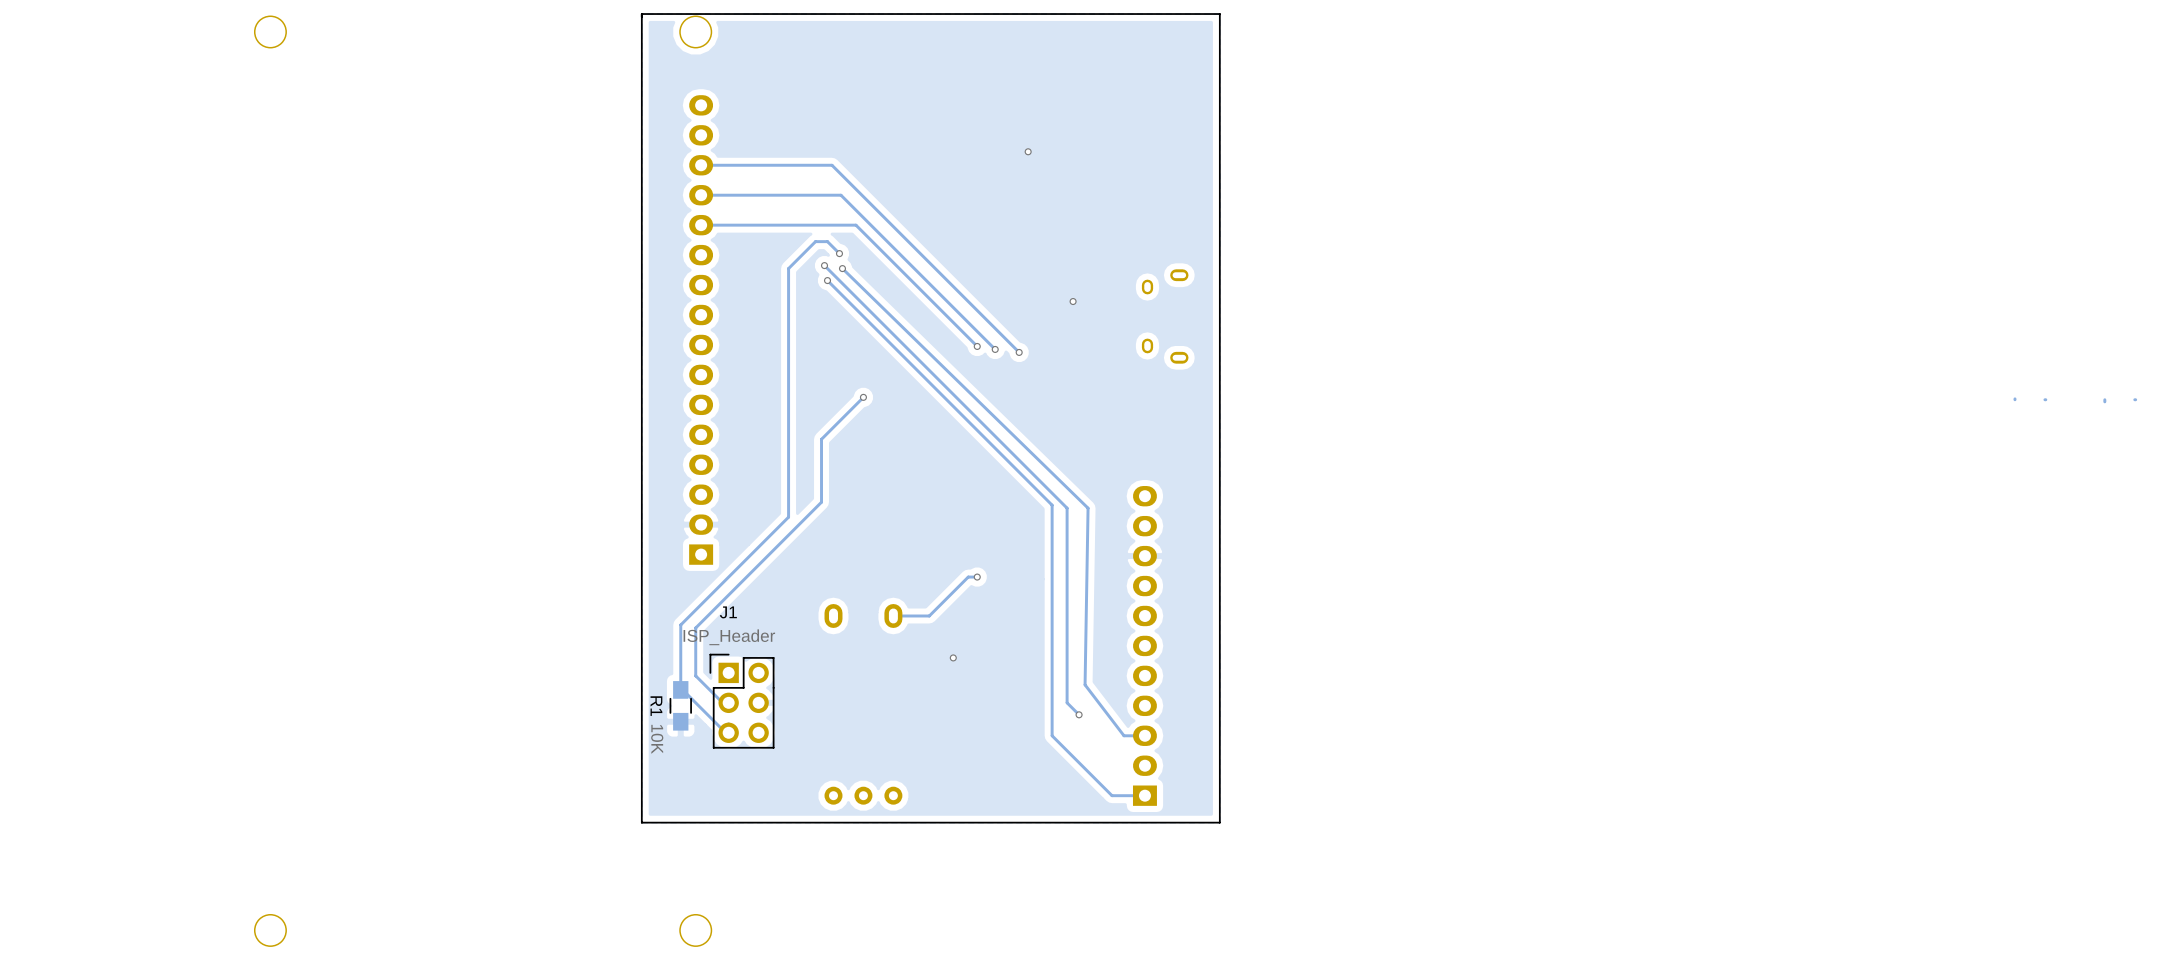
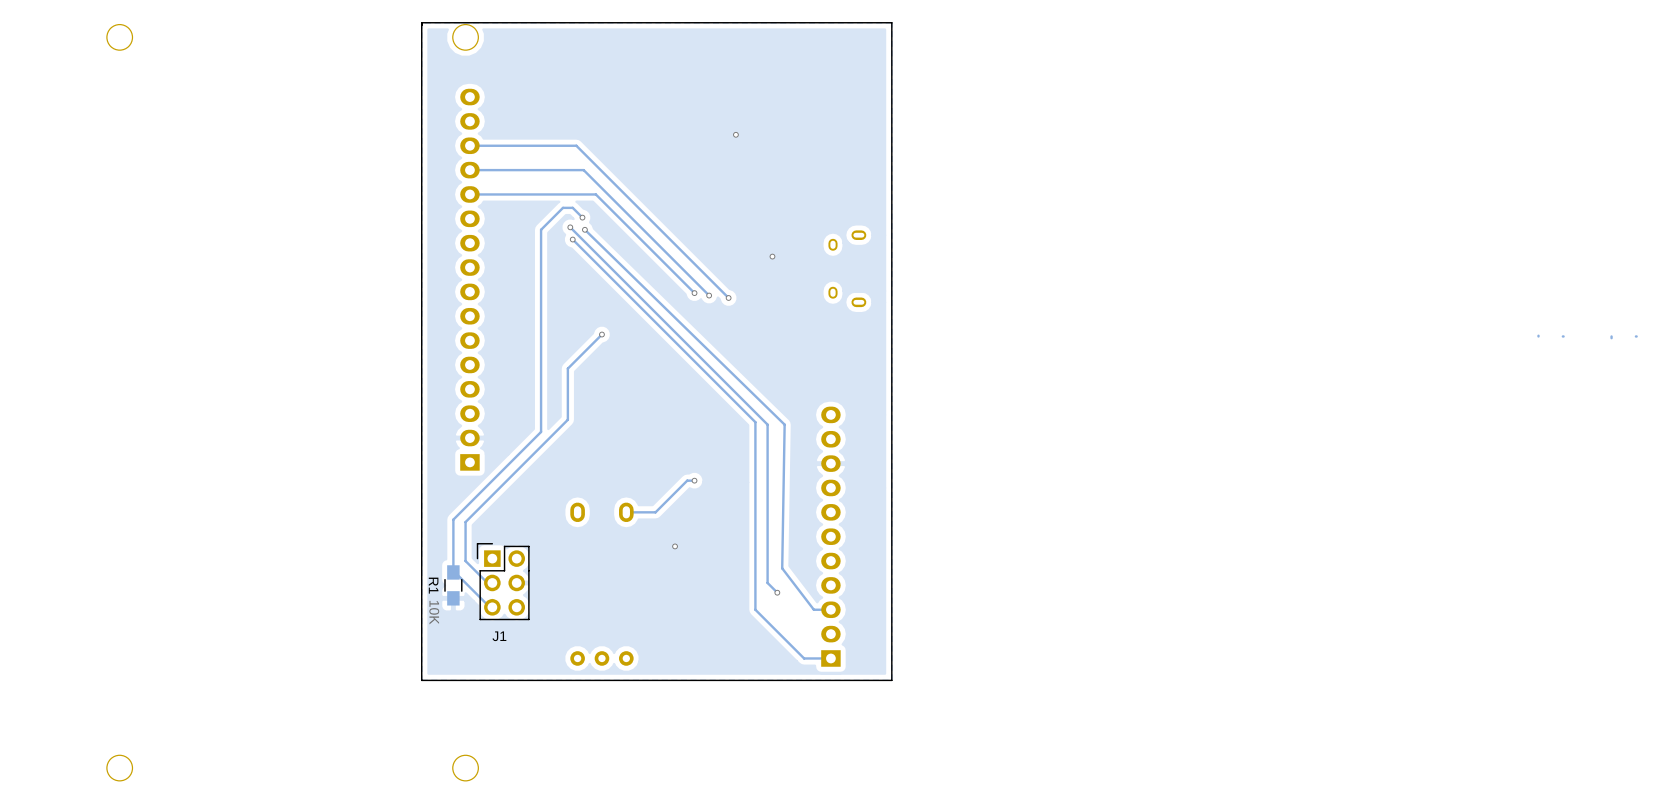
J1 name position: J1 (728, 612) -> J1 (499, 636)
J1 value: ISP_Header (729, 637) -> none

